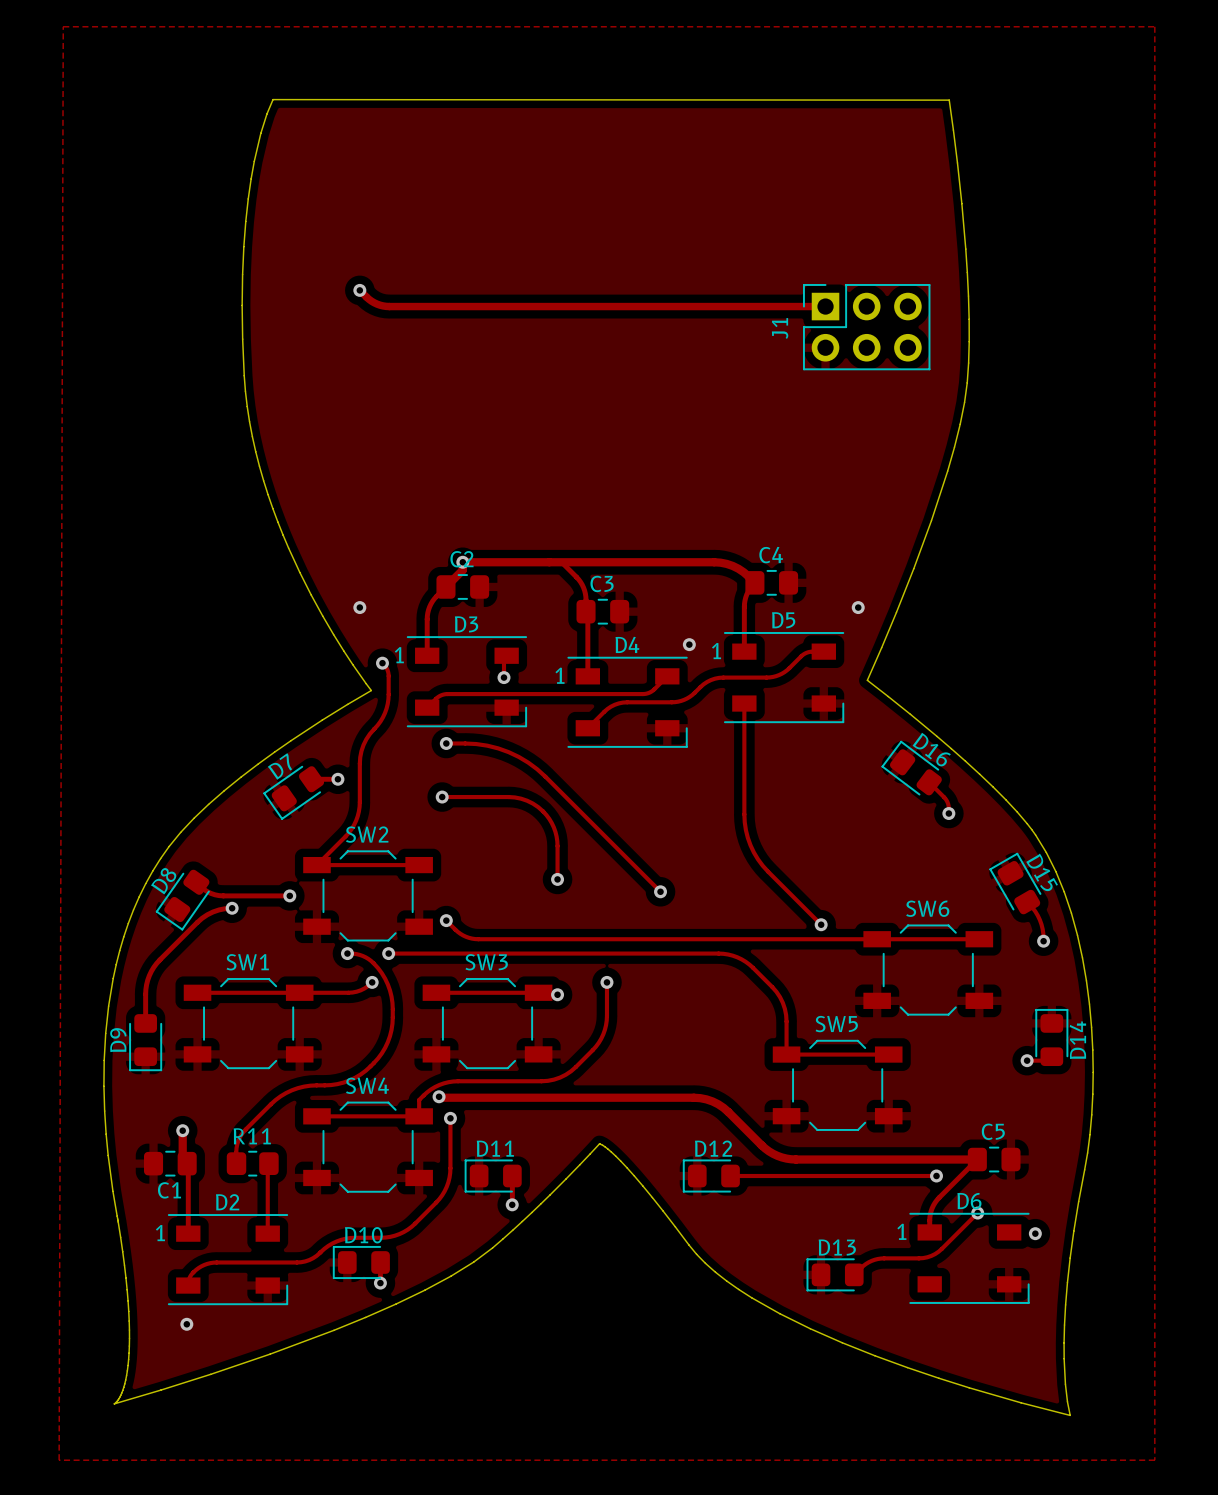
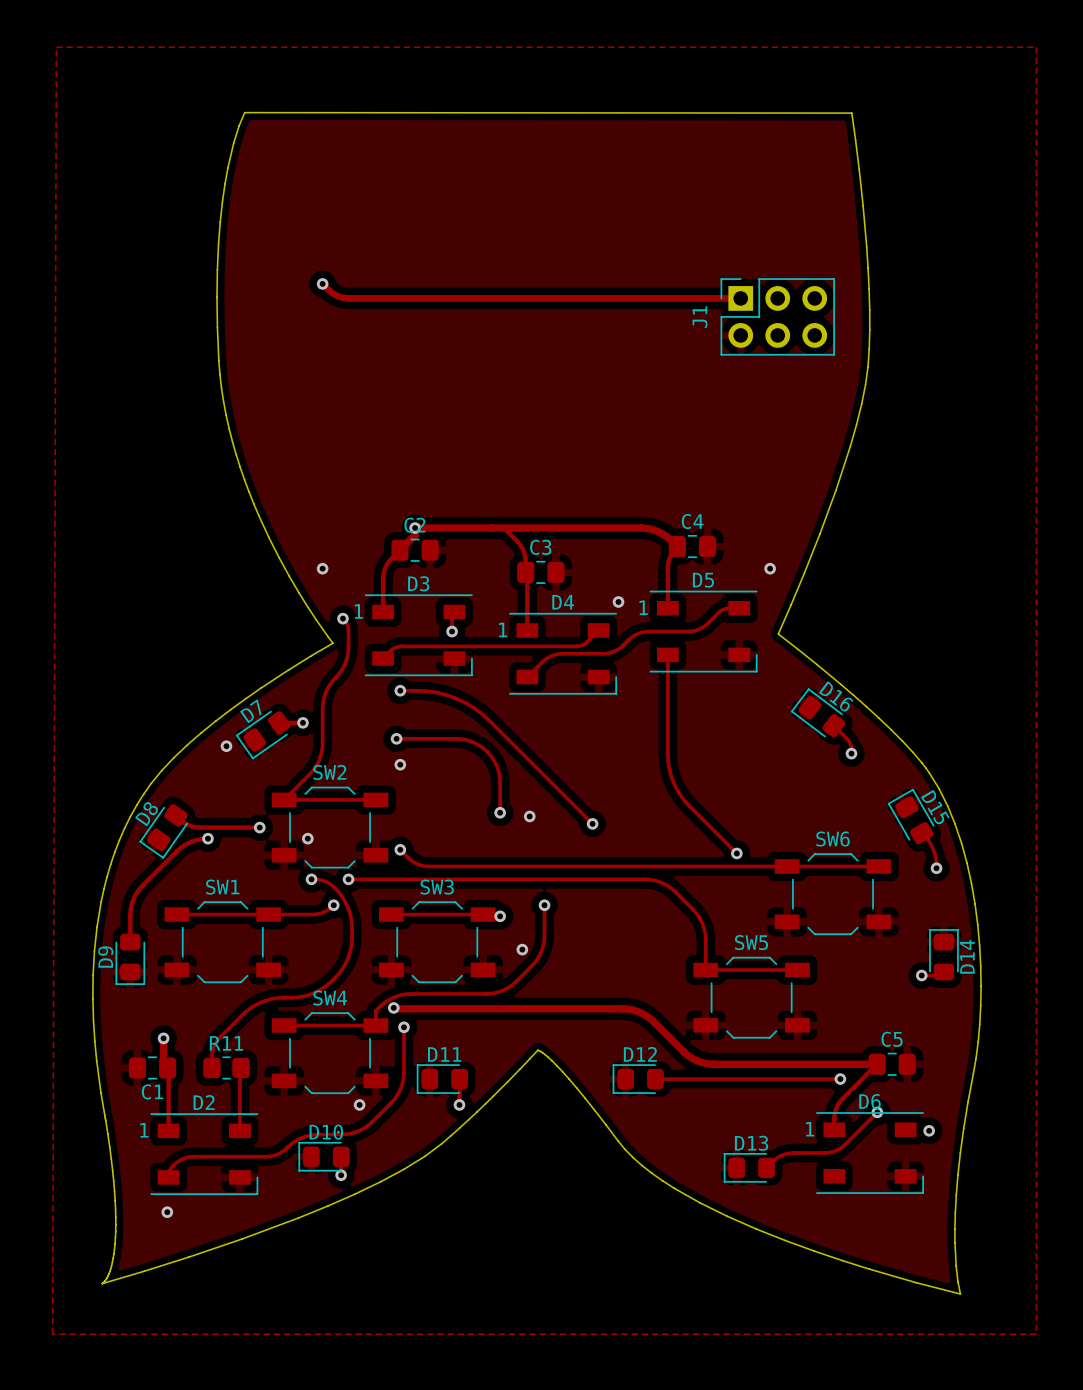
via: none -> (226, 746)
via: none -> (400, 764)
via: none -> (529, 816)
via: none -> (307, 838)
via: none -> (522, 949)
via: none -> (359, 1104)

